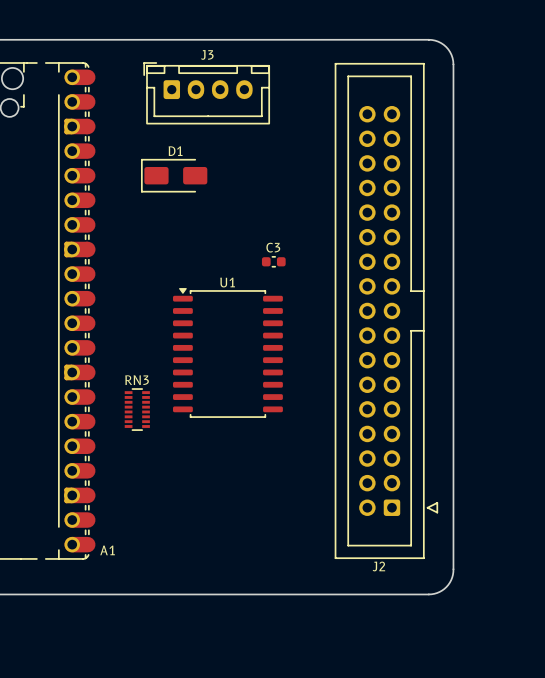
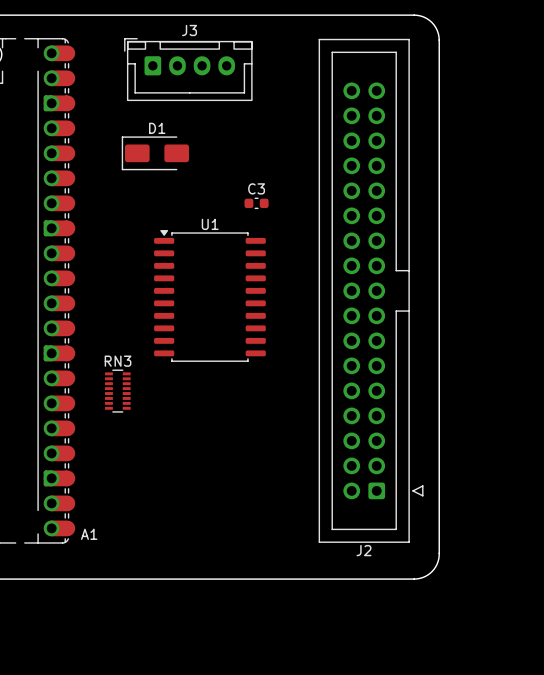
C3 position: (273, 261) -> (256, 203)
U1 position: (227, 352) -> (209, 295)

